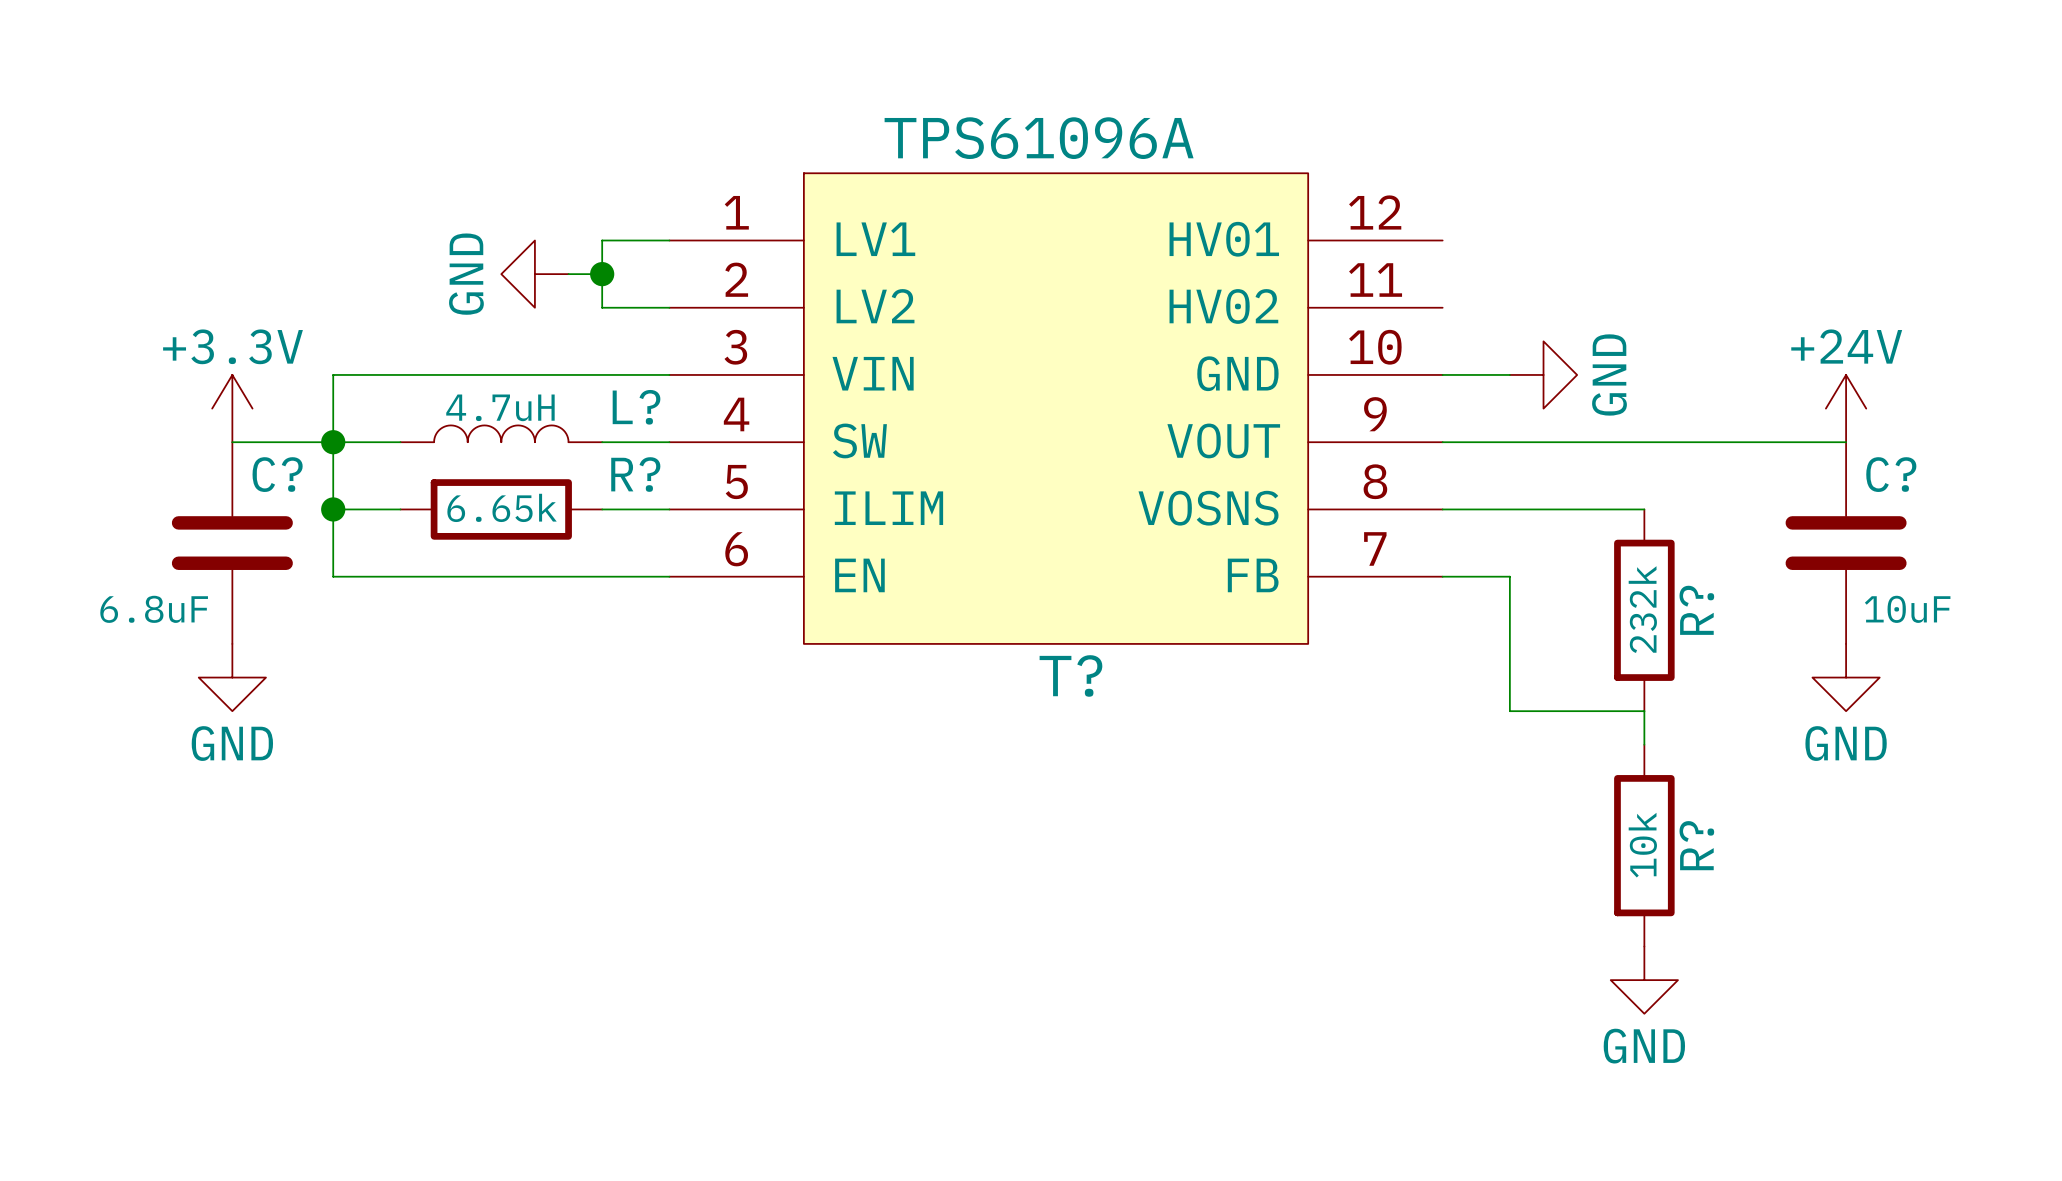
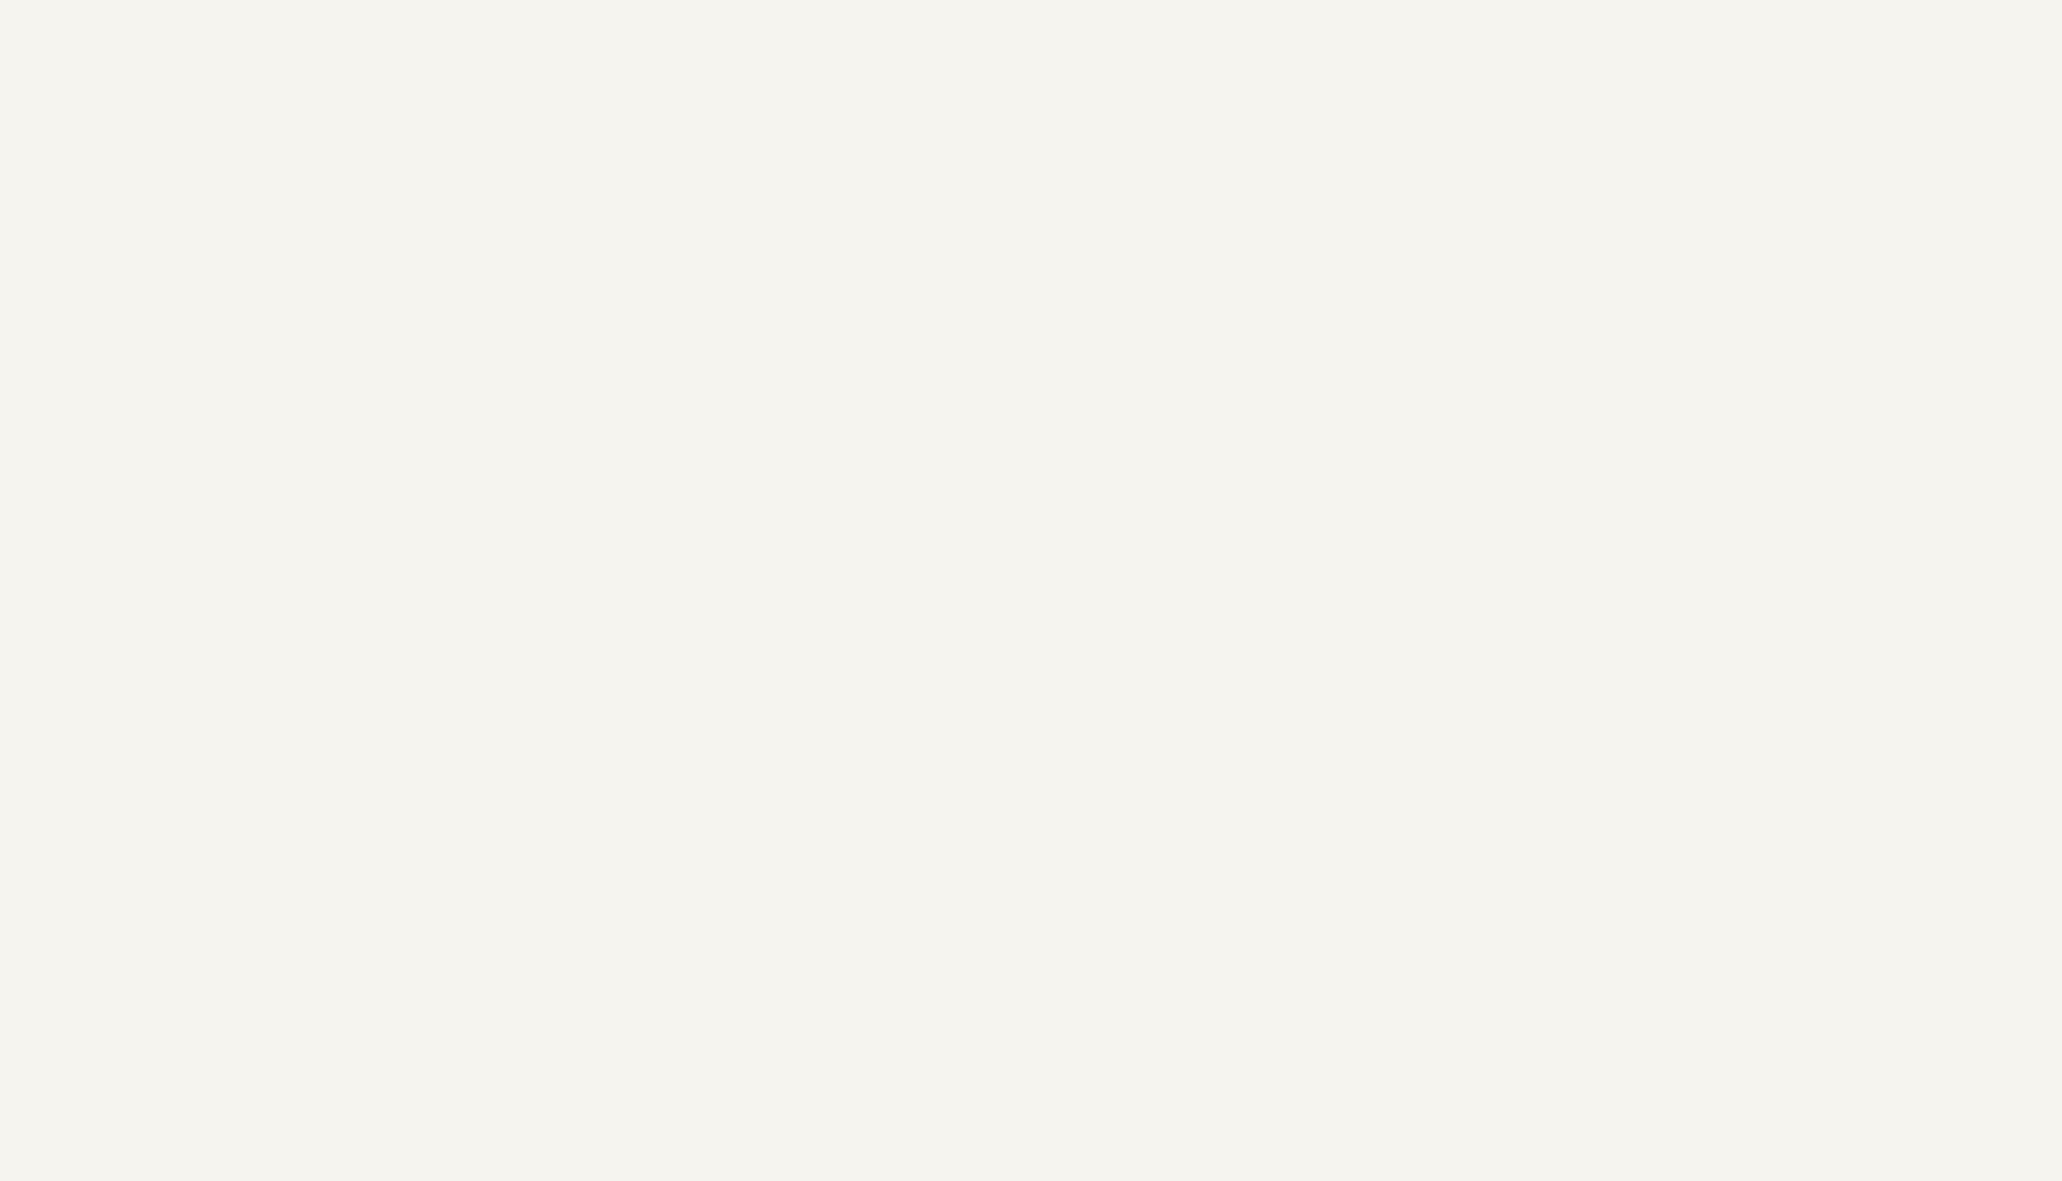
wire: (669, 240) (602, 240) (602, 307) (669, 307) -> none
power symbol: GND (534, 274) -> none
wire: (568, 274) (602, 274) -> none
junction: (602, 274) -> none
wire: (669, 374) (333, 374) (333, 576) (669, 576) -> none
wire: (1442, 374) (1509, 374) -> none
power symbol: GND (1543, 374) -> none
power symbol: +3.3V (232, 408) -> none
T?: TPS61096A (1056, 408) -> none
power symbol: +24V (1846, 408) -> none
L?: 4.7uH (501, 433) -> none
wire: (232, 442) (400, 442) -> none
junction: (333, 442) -> none
wire: (602, 442) (669, 442) -> none
wire: (1442, 442) (1846, 442) -> none
wire: (333, 509) (400, 509) -> none
junction: (333, 509) -> none
R?: 6.65k (501, 509) -> none
wire: (602, 509) (669, 509) -> none
wire: (1442, 509) (1644, 509) -> none
C?: 6.8uF (232, 543) -> none
C?: 10uF (1846, 543) -> none
wire: (1442, 576) (1509, 576) (1509, 711) (1644, 711) (1644, 744) -> none
R?: 232k (1644, 610) -> none
power symbol: GND (232, 677) -> none
power symbol: GND (1846, 677) -> none
R?: 10k (1644, 845) -> none
power symbol: GND (1644, 980) -> none

